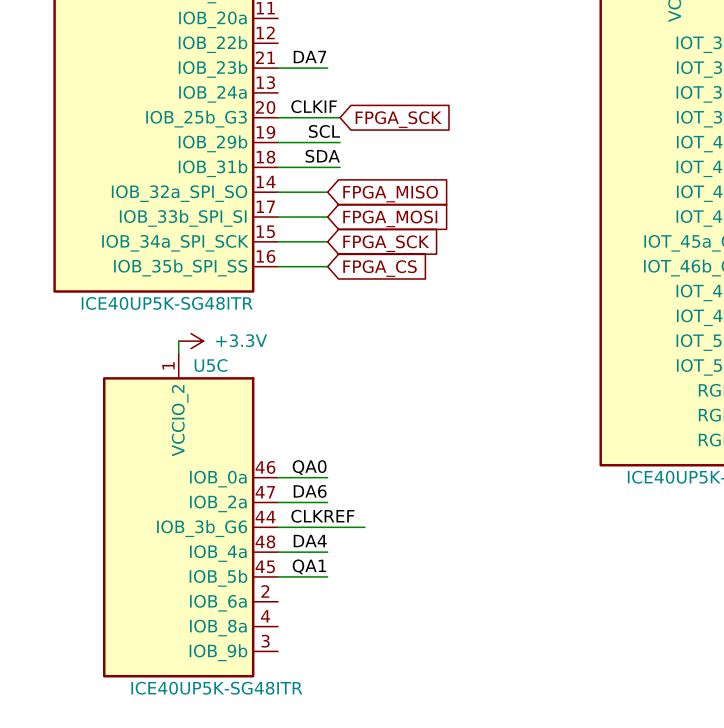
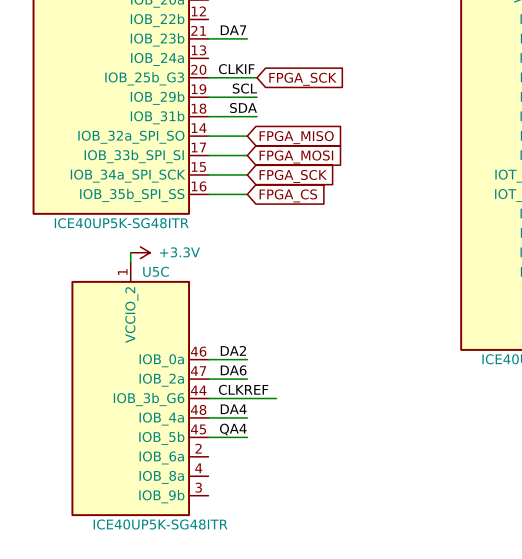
label: QA0 (309, 467) -> DA2 (233, 350)
label: QA1 (309, 566) -> QA4 (233, 429)

